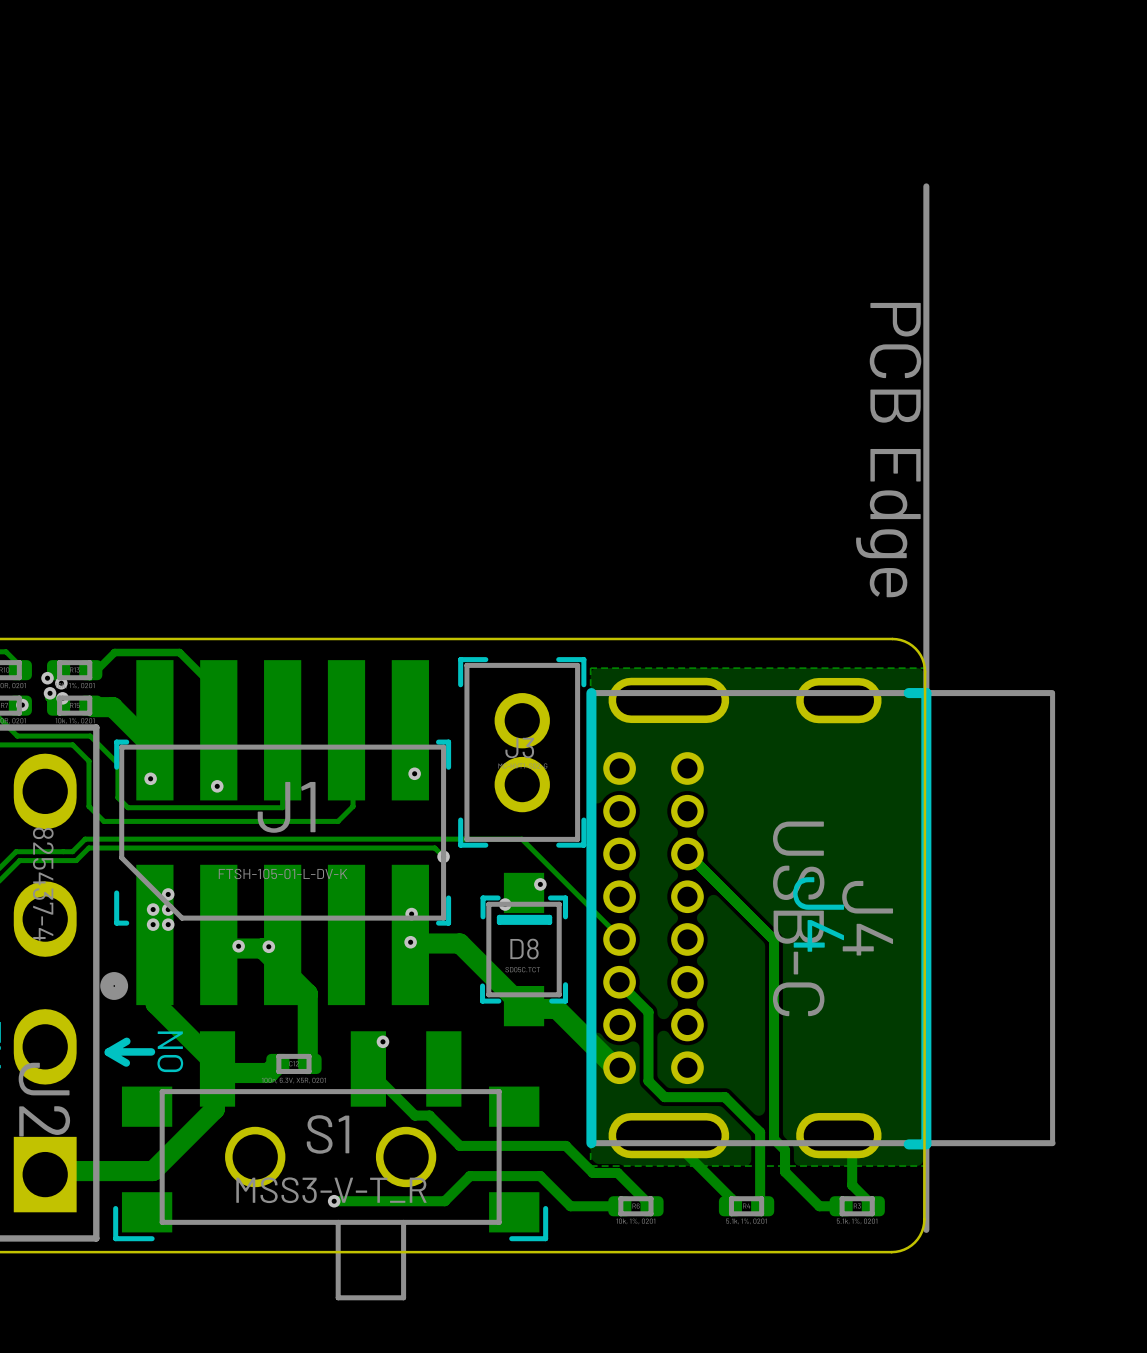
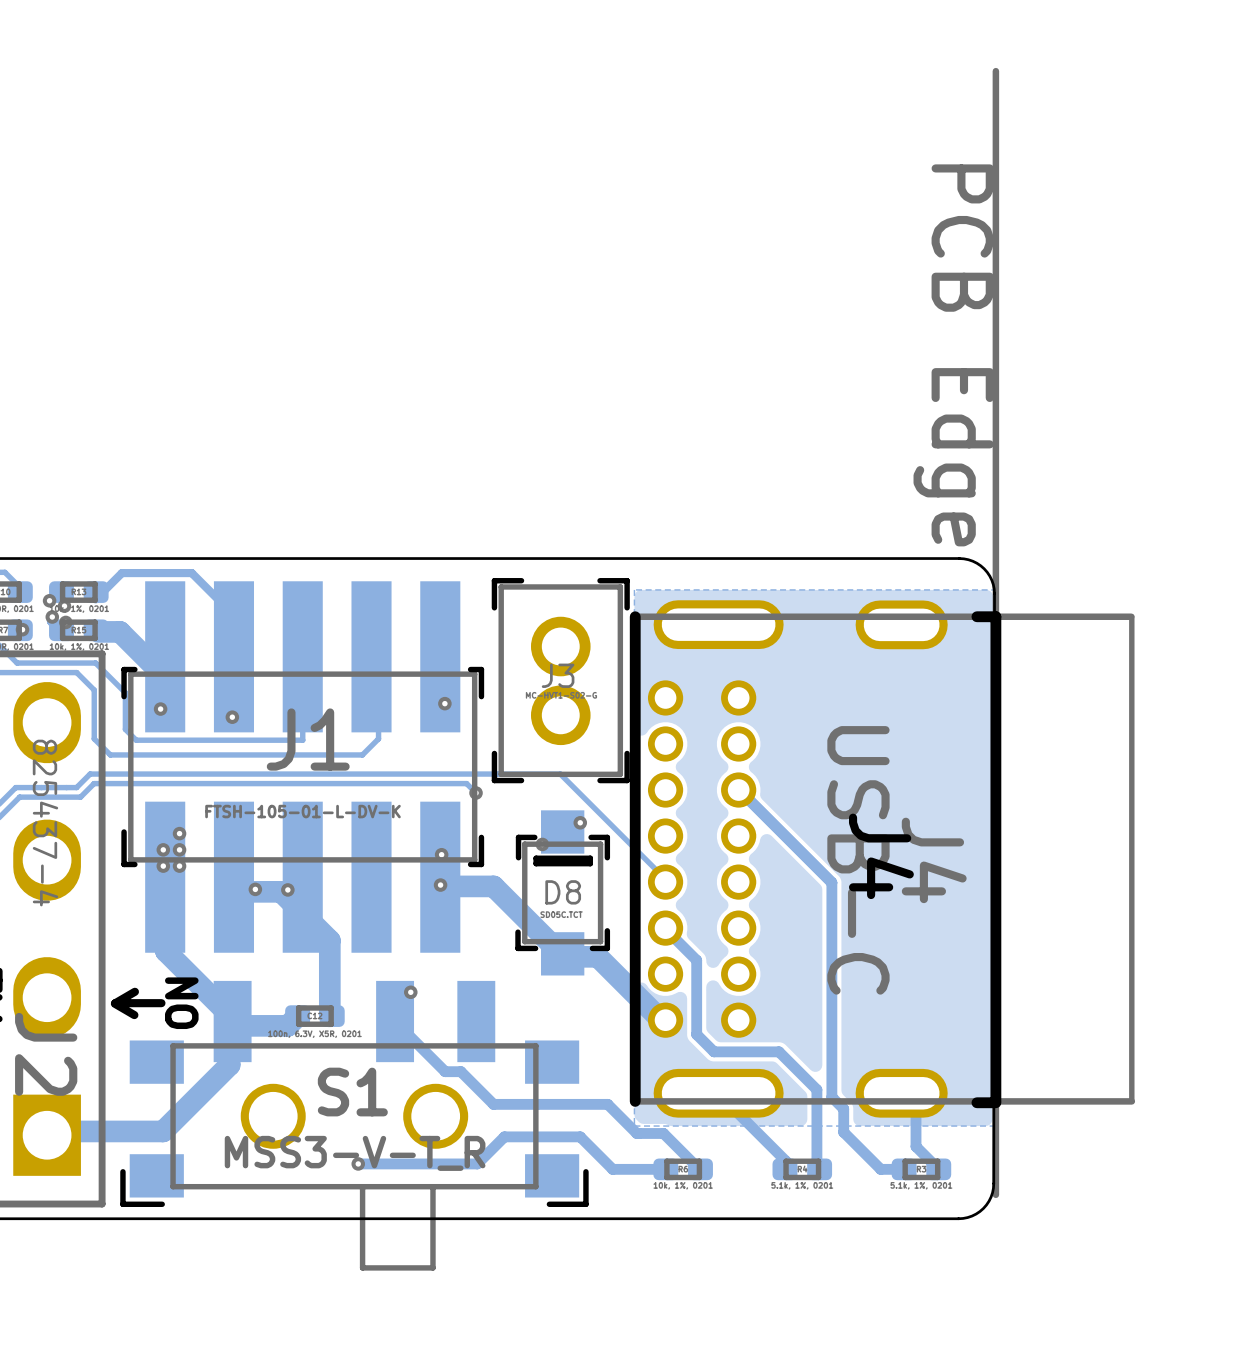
J1 footprint: [100, 660, 452, 1006] -> [121, 581, 485, 953]

